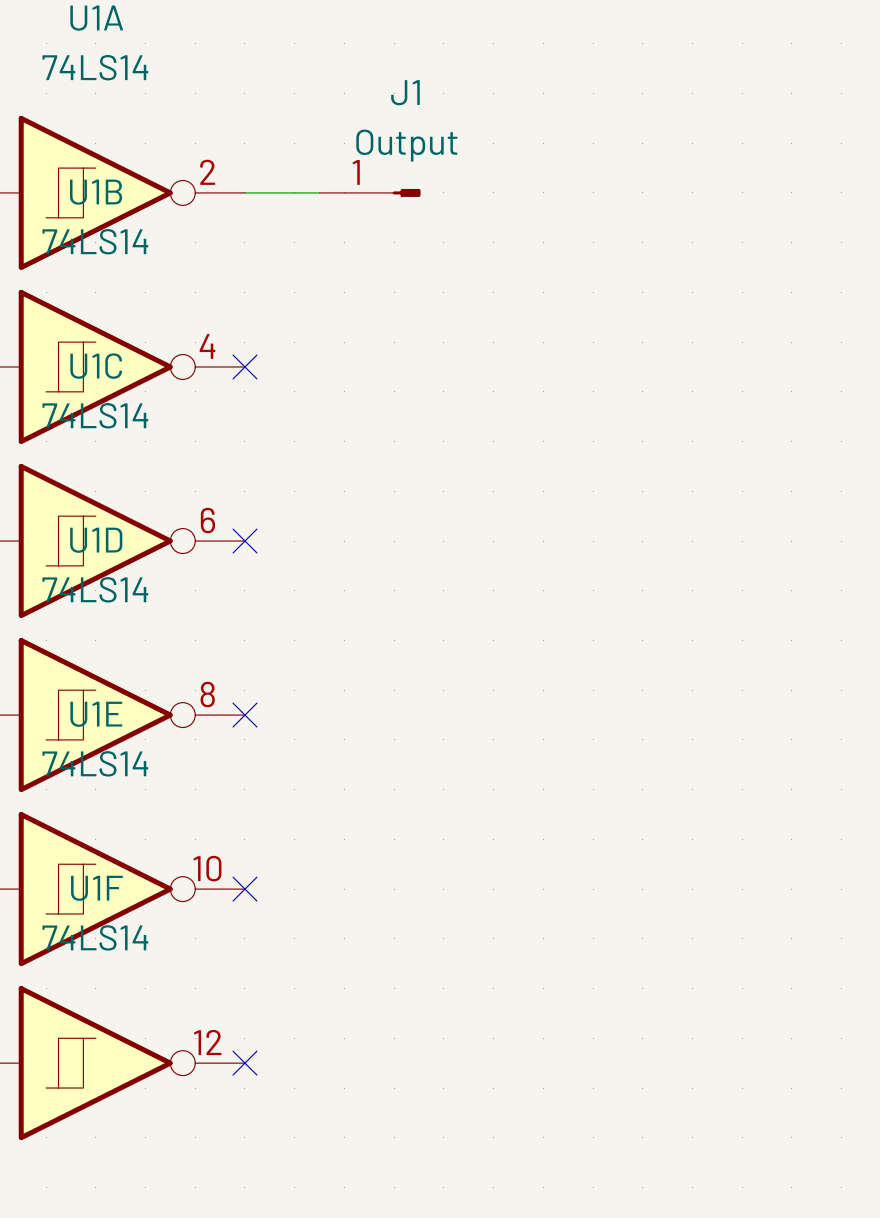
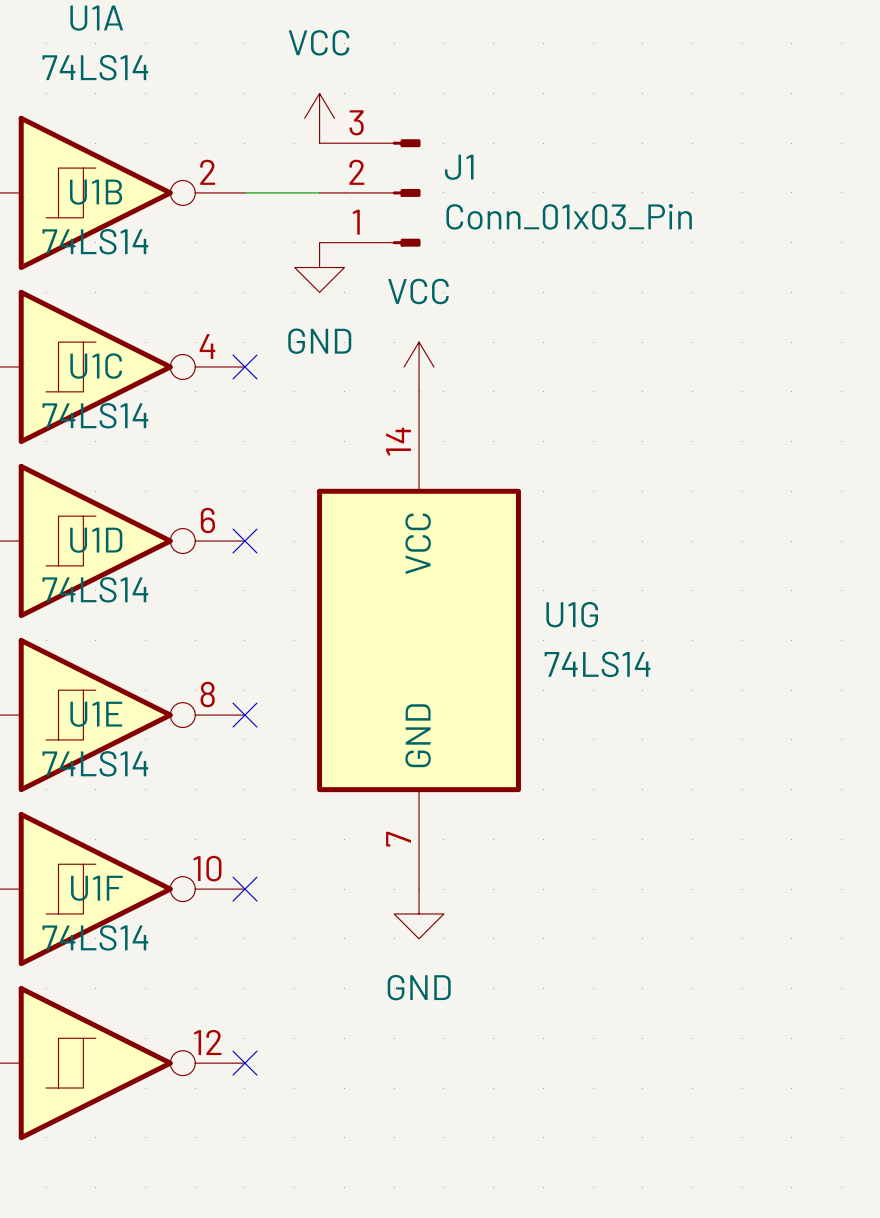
J1 name position: J1 (405, 92) -> J1 (459, 167)
power symbol: none -> VCC (319, 118)
J1 value: Output (406, 145) -> Conn_01x03_Pin (569, 216)
J1 symbol: [319, 188, 421, 197] -> [319, 139, 421, 247]
power symbol: none -> GND (319, 267)
power symbol: none -> VCC (419, 366)
U1G: none -> 74LS14 (419, 640)
power symbol: none -> GND (419, 913)

